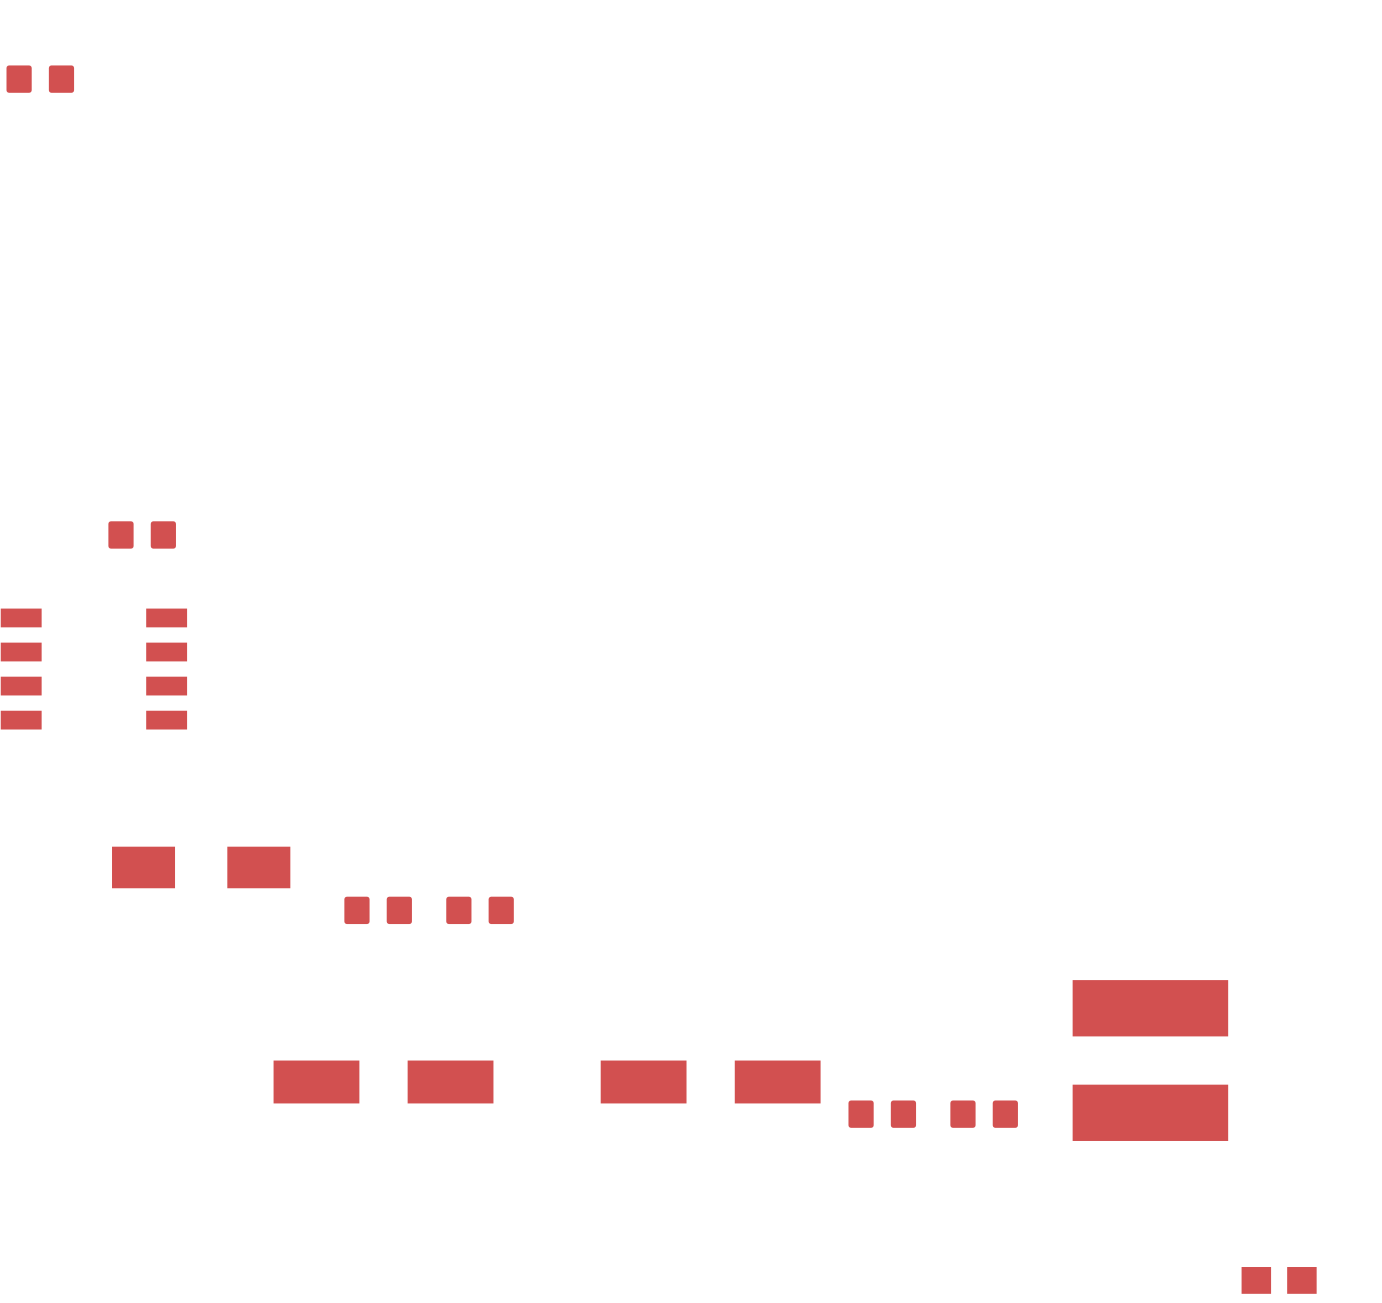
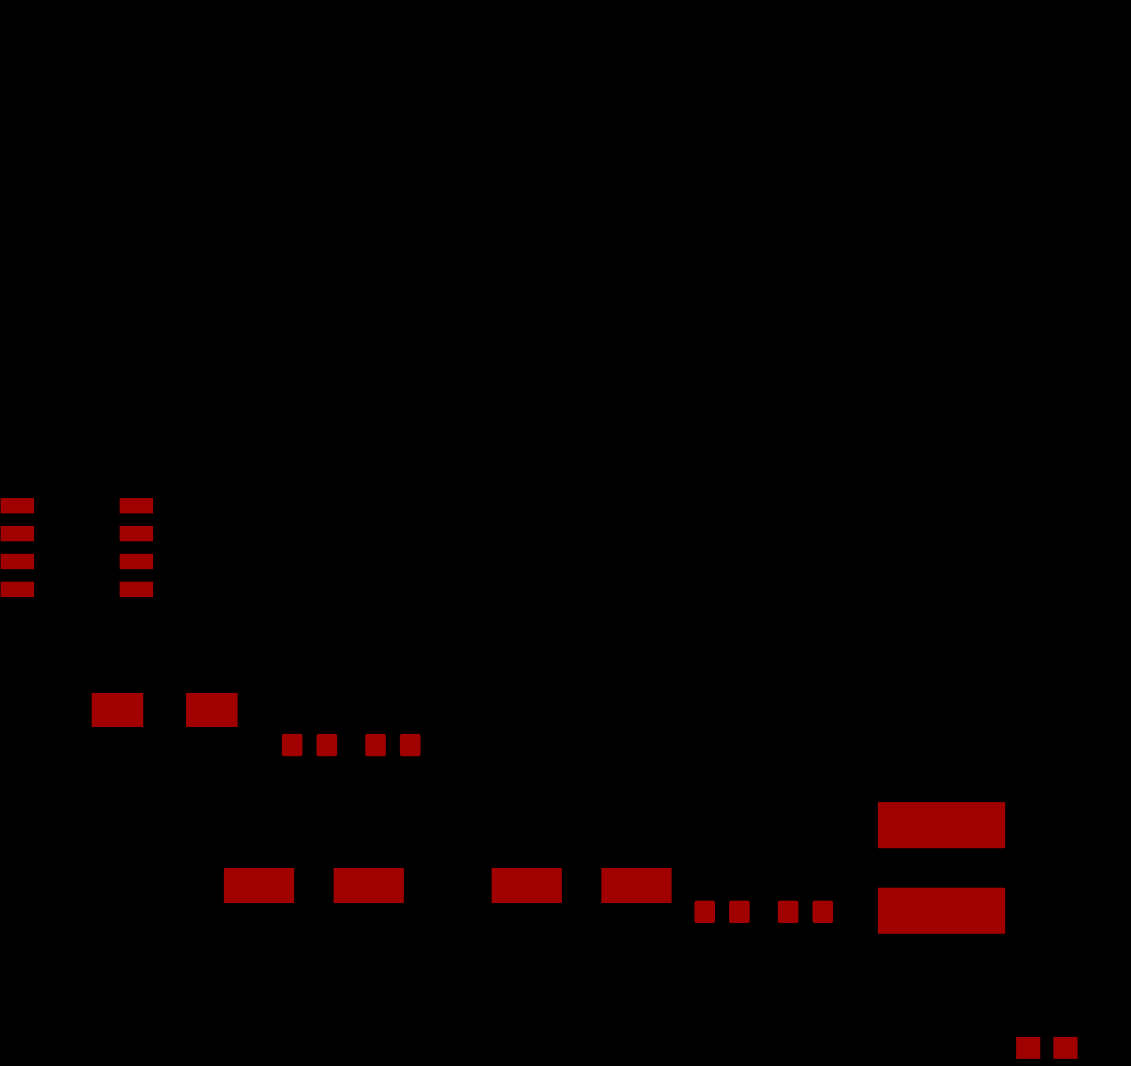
part: (40, 79) -> none
part: (142, 534) -> none

